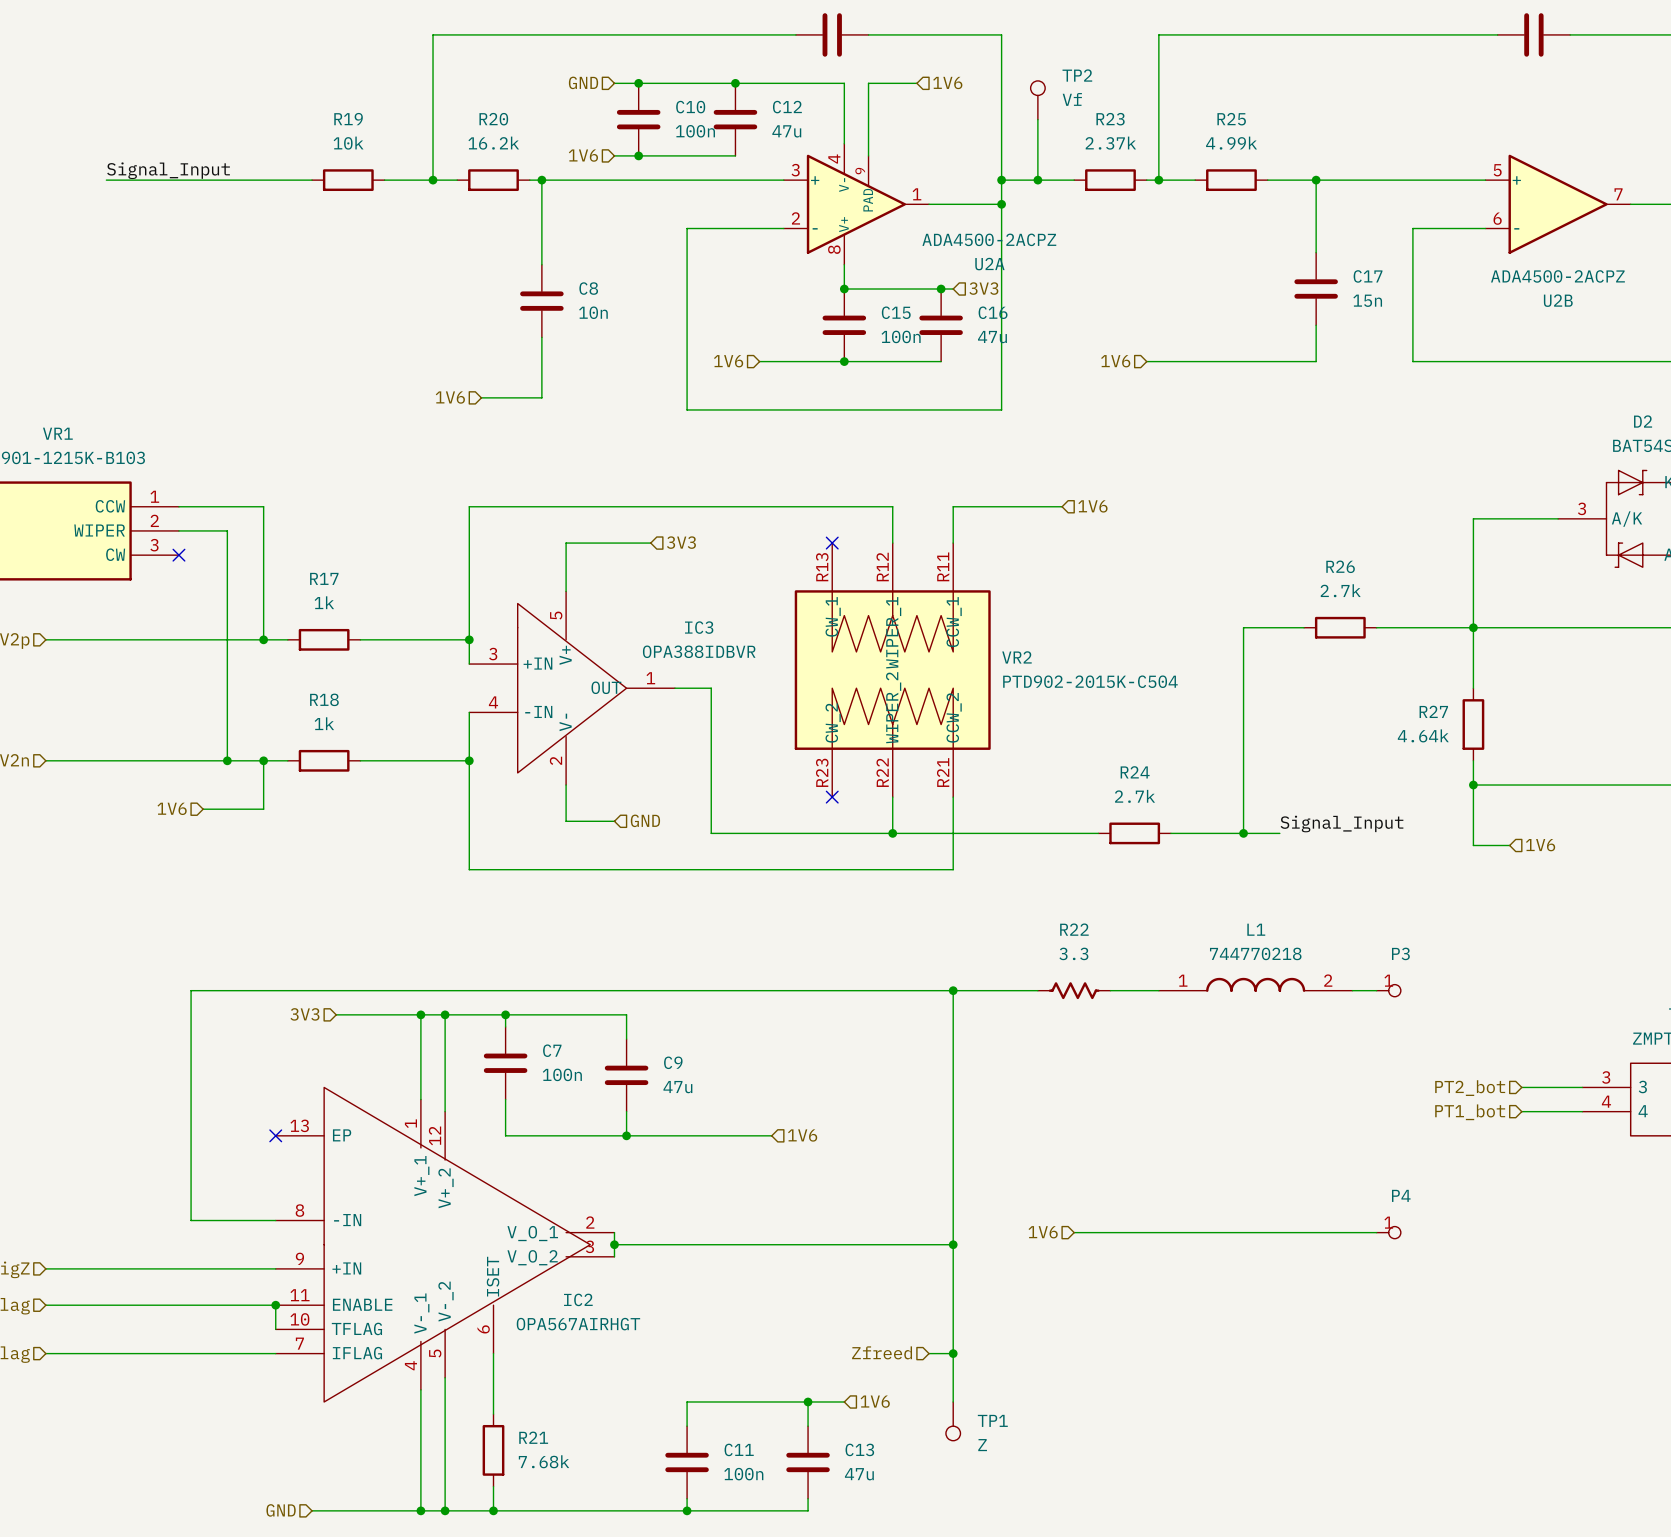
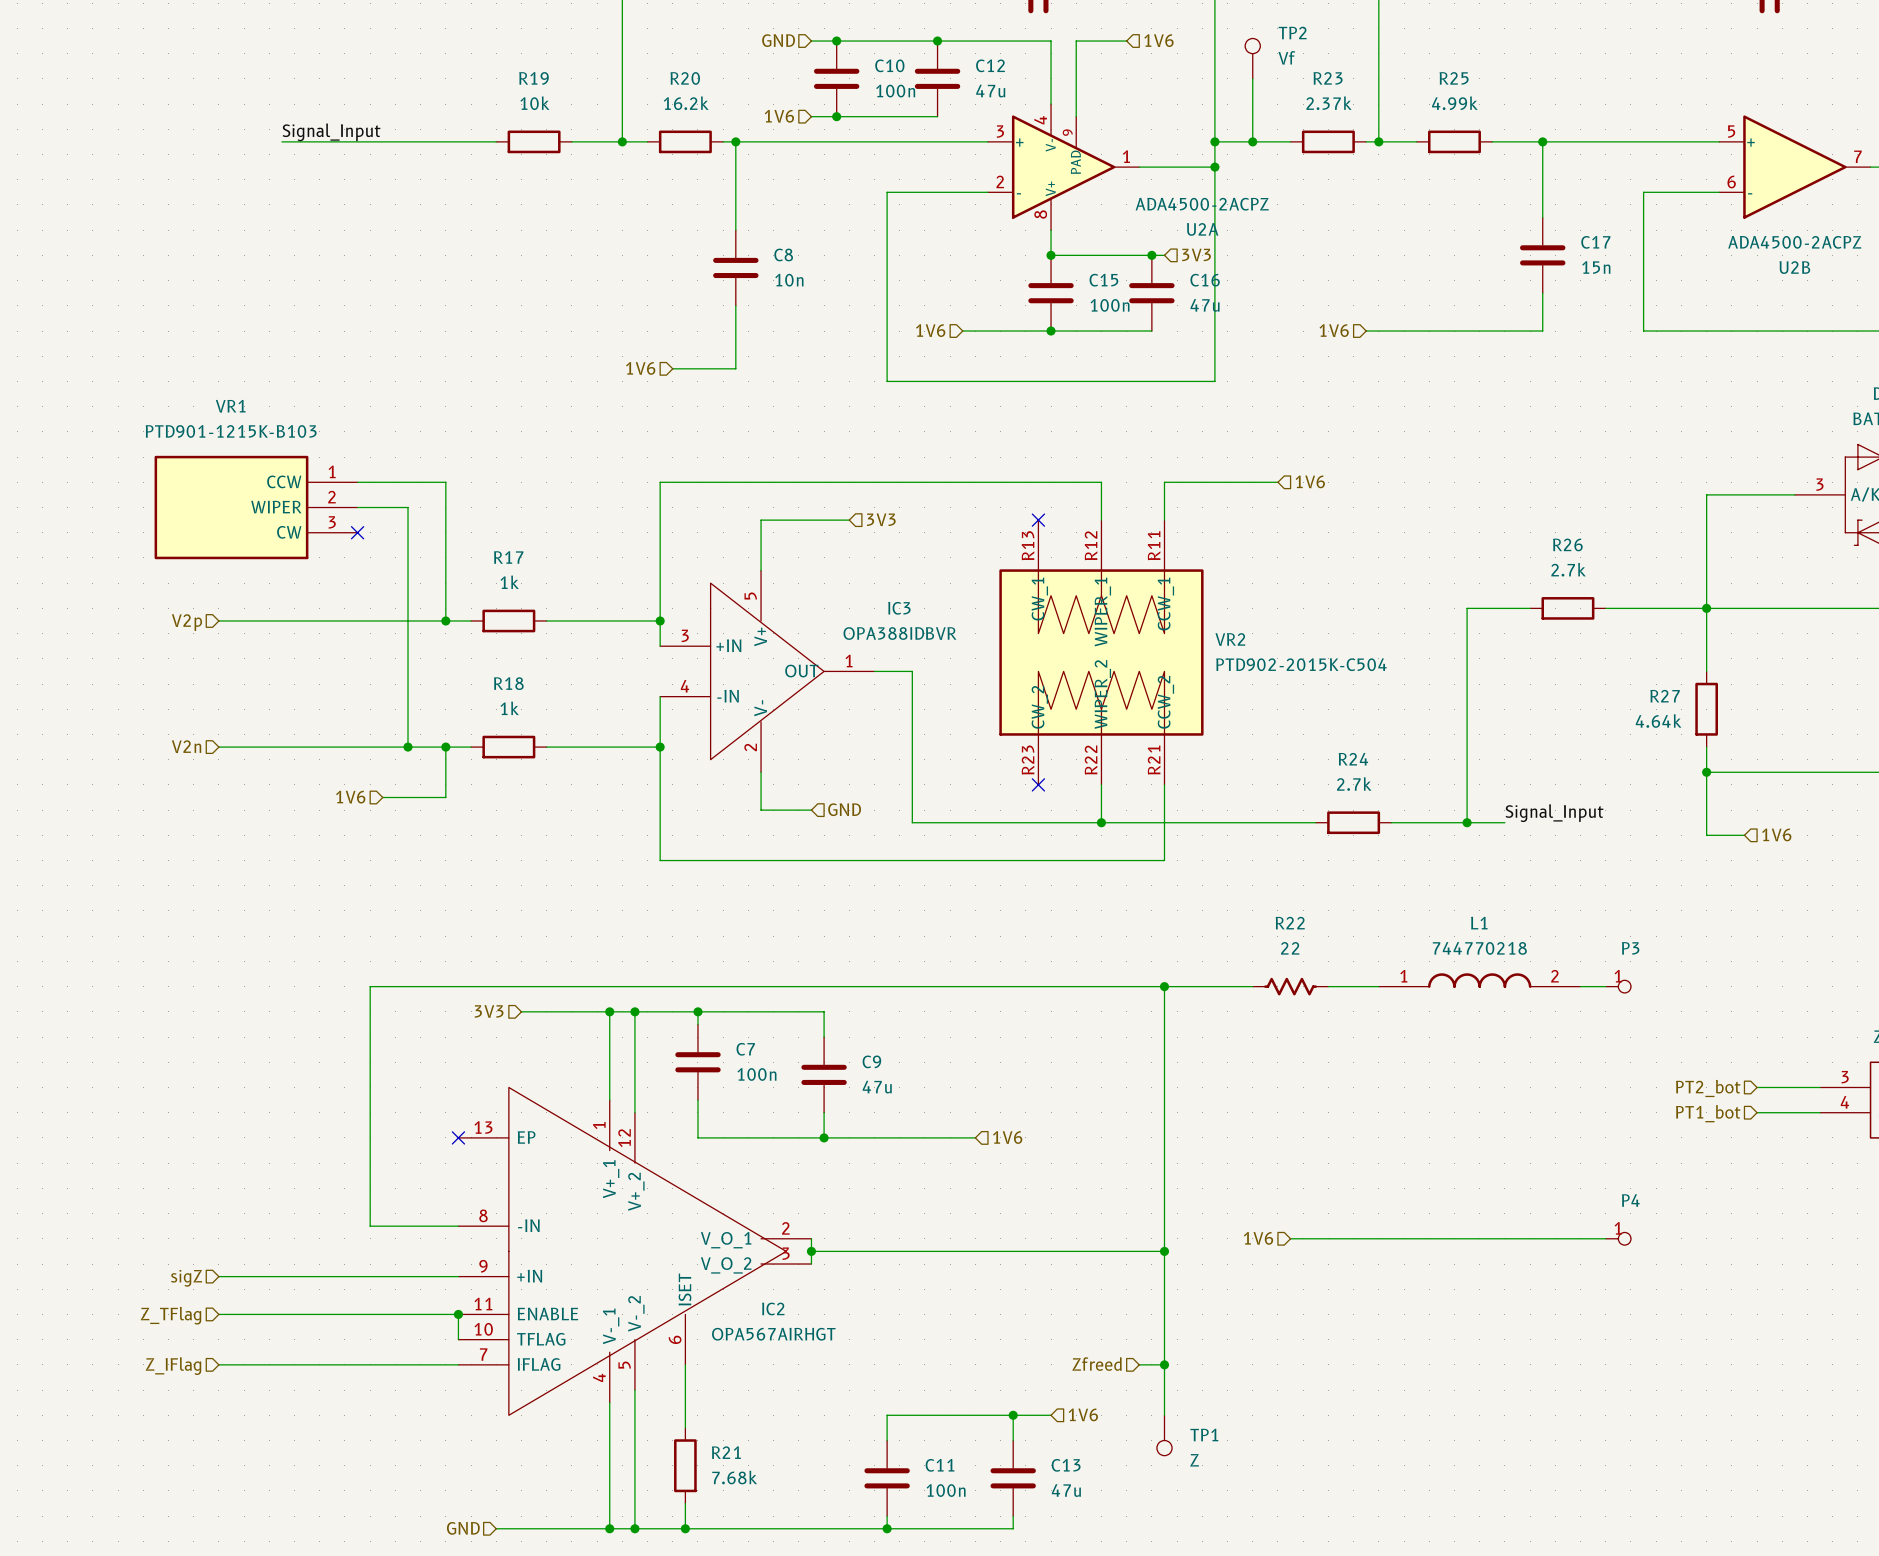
R22 value: 3.3 (1073, 953) -> 22 (1290, 948)

